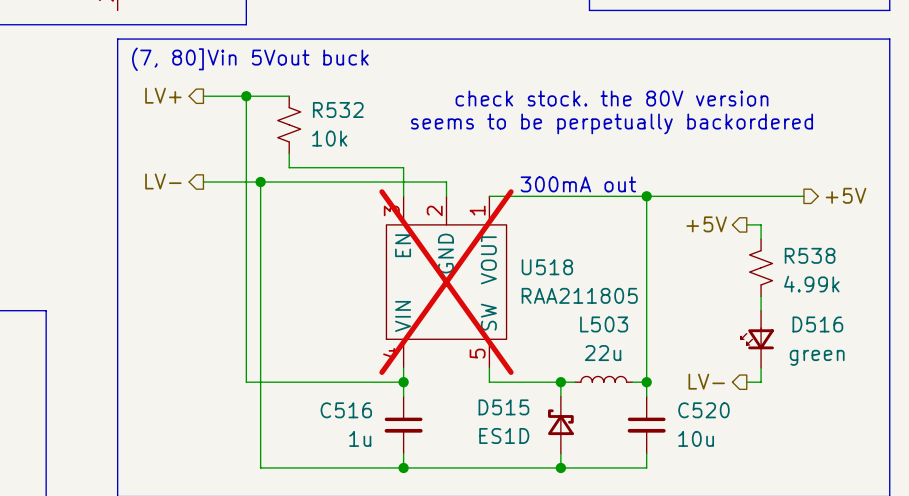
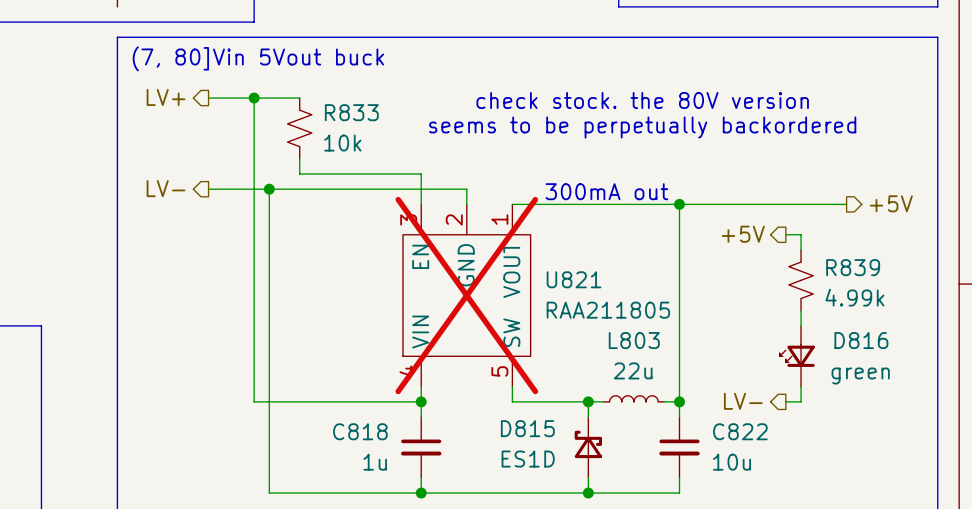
R532 name: R532 (338, 109) -> R833 (351, 112)
R538 name: R538 (810, 255) -> R839 (853, 267)
U518 name: U518 (547, 267) -> U821 (573, 279)
L503 name: L503 (604, 324) -> L803 (634, 340)
D516 name: D516 (817, 324) -> D816 (861, 340)
D515 name: D515 (503, 407) -> D815 (527, 428)
C516 name: C516 (346, 410) -> C818 (360, 431)
C520 name: C520 (703, 410) -> C822 (740, 431)

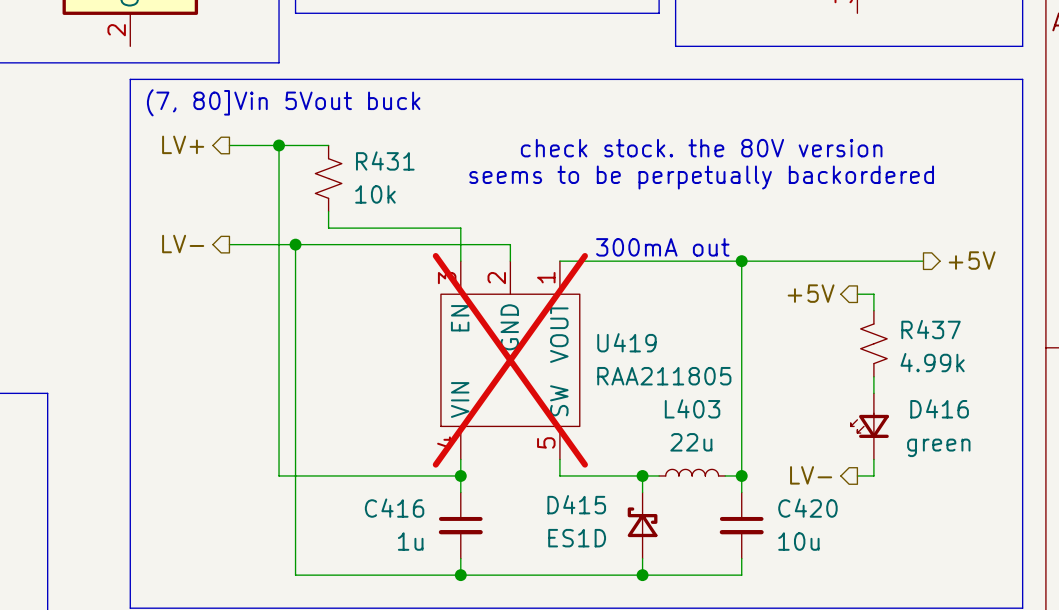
R833 name: R833 (351, 112) -> R431 (385, 160)
R839 name: R839 (853, 267) -> R437 (931, 329)
U821 name: U821 (573, 279) -> U419 (626, 342)
L803 name: L803 (634, 340) -> L403 (692, 408)
D816 name: D816 (861, 340) -> D416 (939, 408)
D815 name: D815 (527, 428) -> D415 (576, 504)
C818 name: C818 (360, 431) -> C416 (394, 508)
C822 name: C822 (740, 431) -> C420 (807, 508)

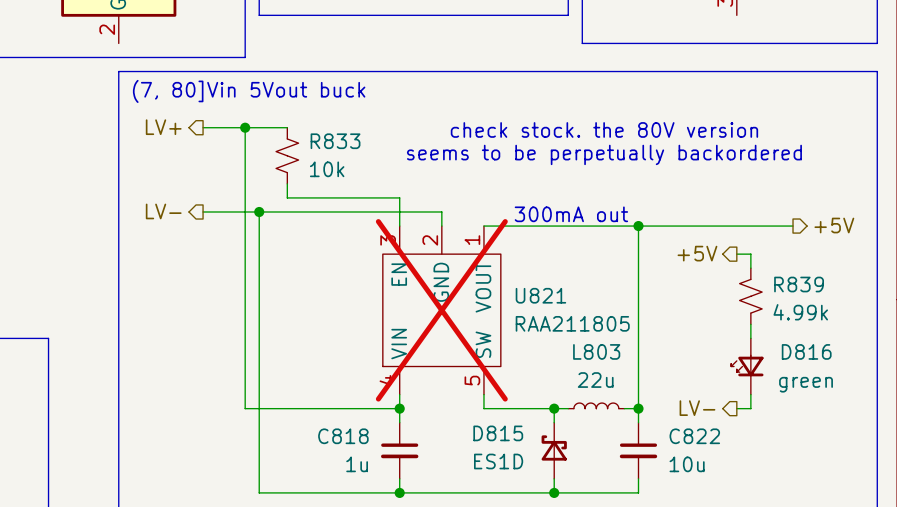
R431 name: R431 (385, 160) -> R833 (335, 141)
R437 name: R437 (931, 329) -> R839 (799, 284)
U419 name: U419 (626, 342) -> U821 (540, 295)
L403 name: L403 (692, 408) -> L803 (596, 351)
D416 name: D416 (939, 408) -> D816 (806, 351)
D415 name: D415 (576, 504) -> D815 (498, 433)
C416 name: C416 (394, 508) -> C818 (343, 436)
C420 name: C420 (807, 508) -> C822 (694, 436)

